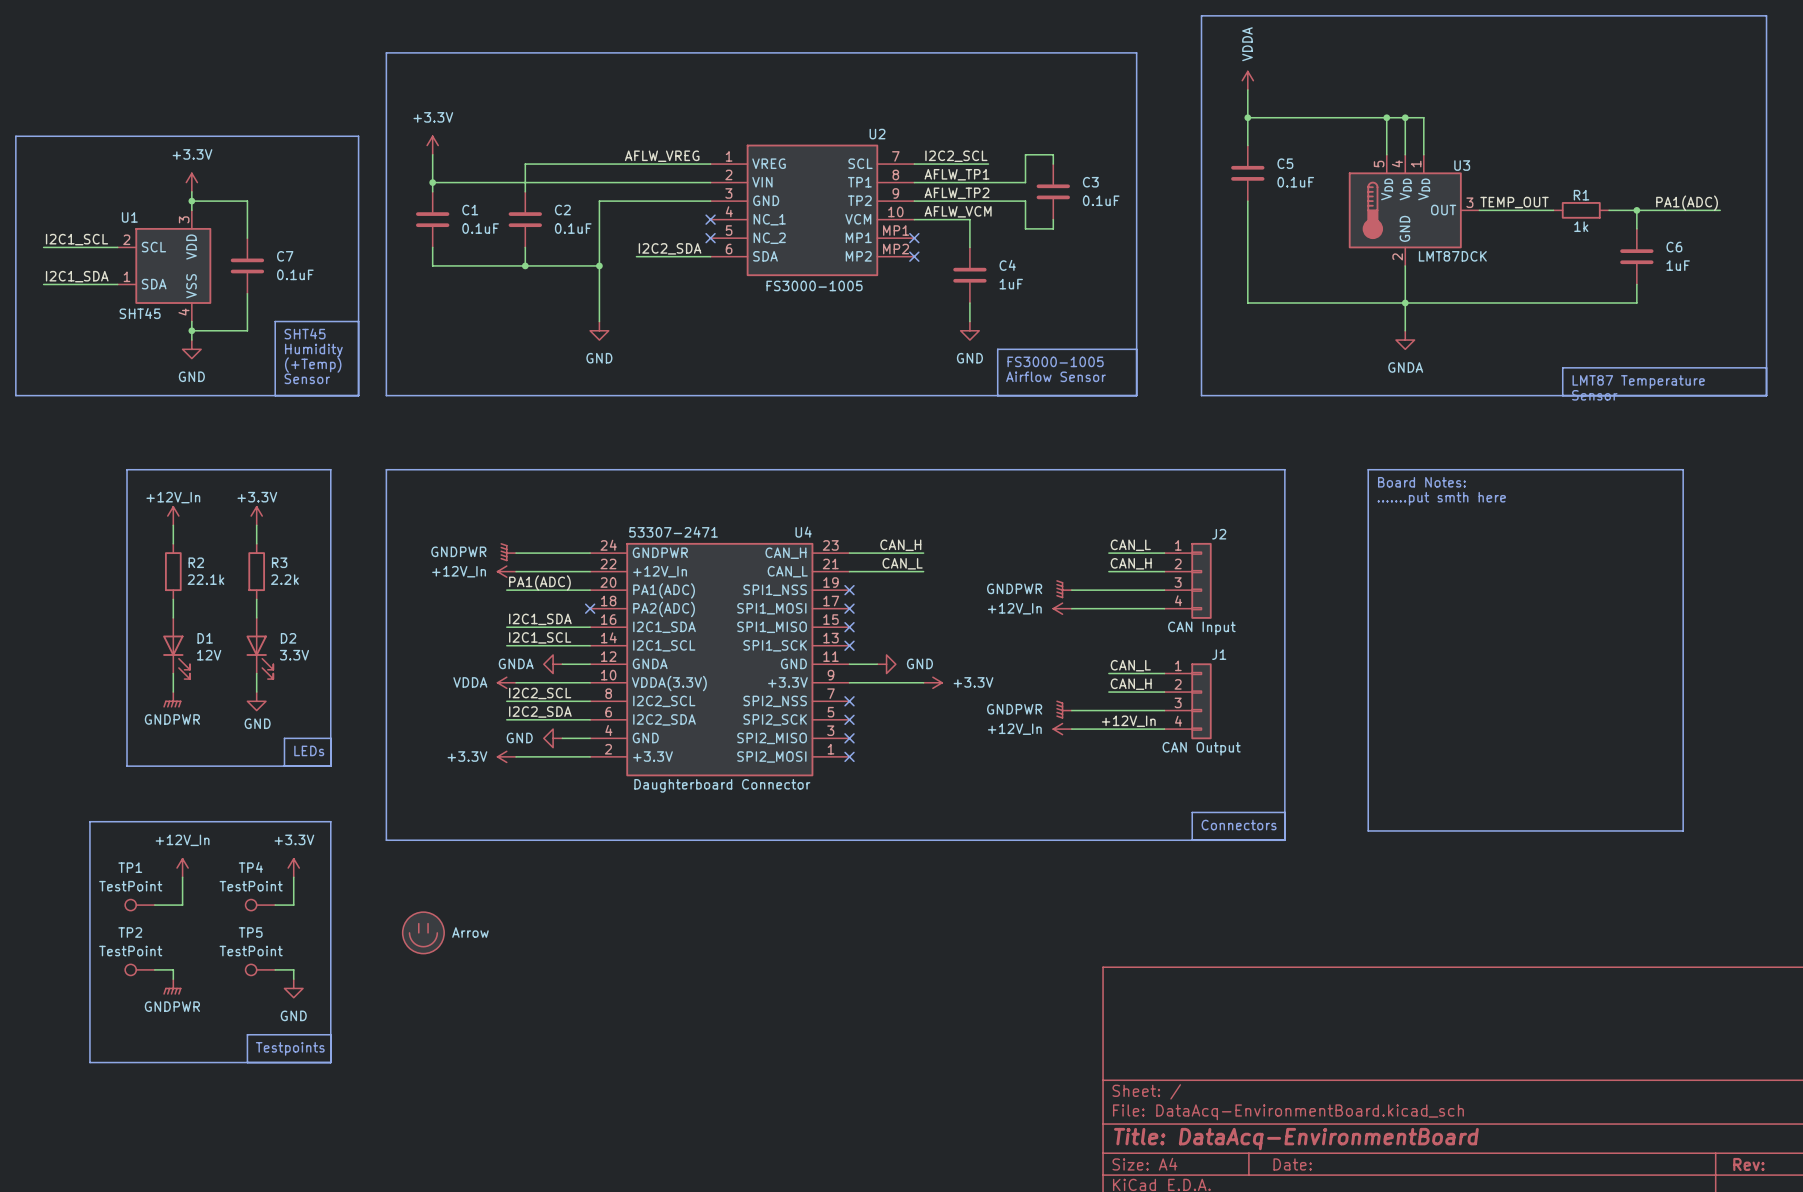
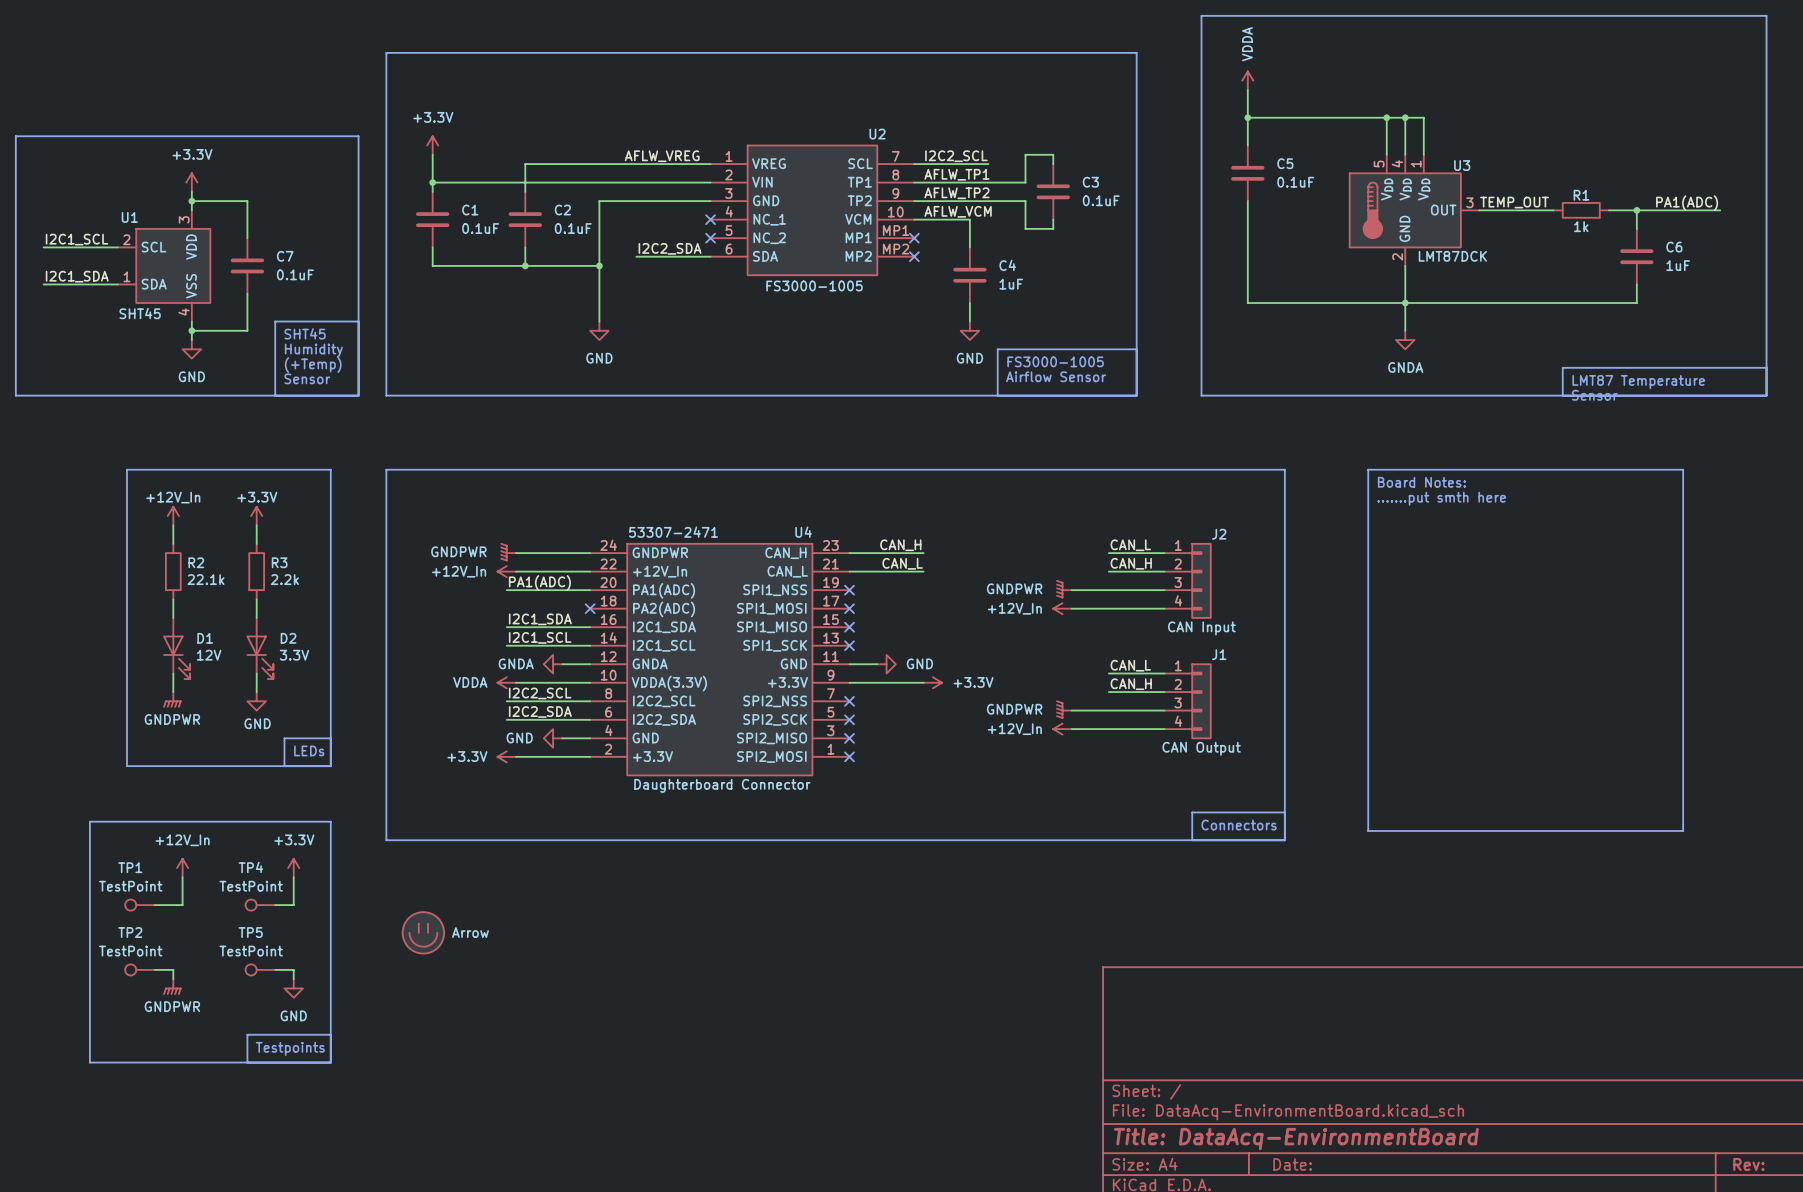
label: +12V_In (1128, 721) -> none

